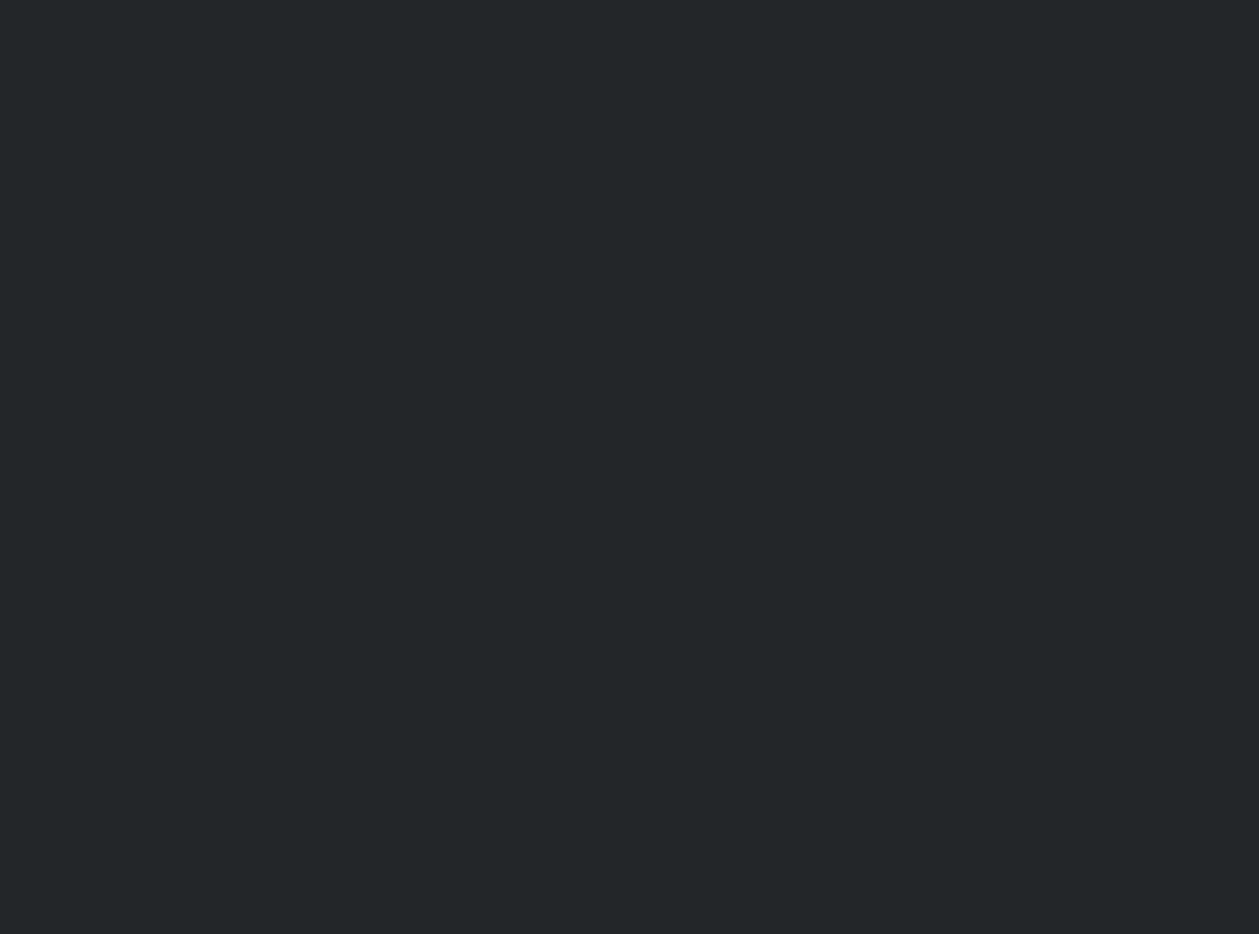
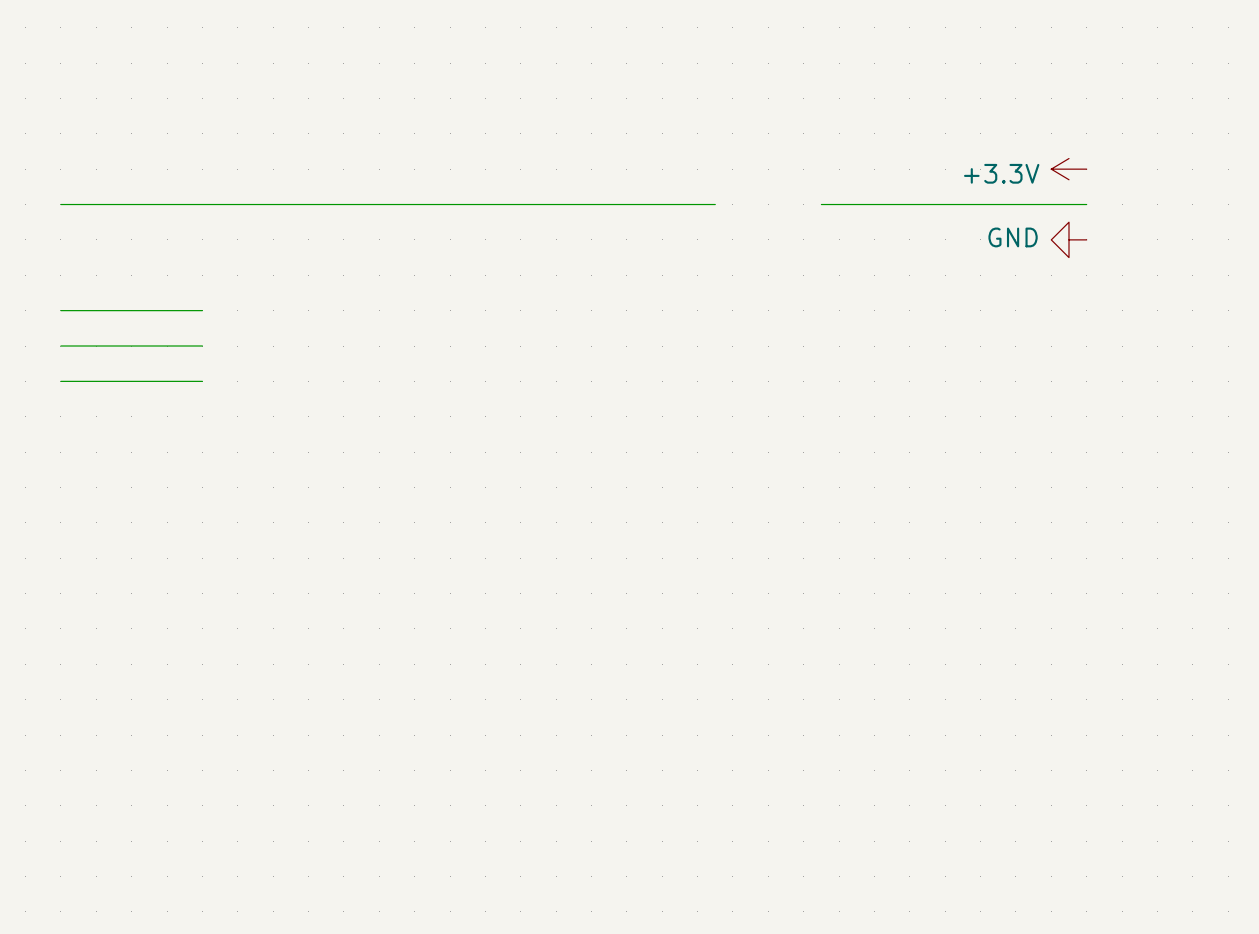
power symbol: none -> +3.3V (1068, 169)
wire: none -> (60, 204) (715, 204)
wire: none -> (821, 204) (1086, 204)
power symbol: none -> GND (1068, 239)
wire: none -> (60, 310) (202, 310)
wire: none -> (60, 346) (202, 346)
wire: none -> (60, 381) (202, 381)

